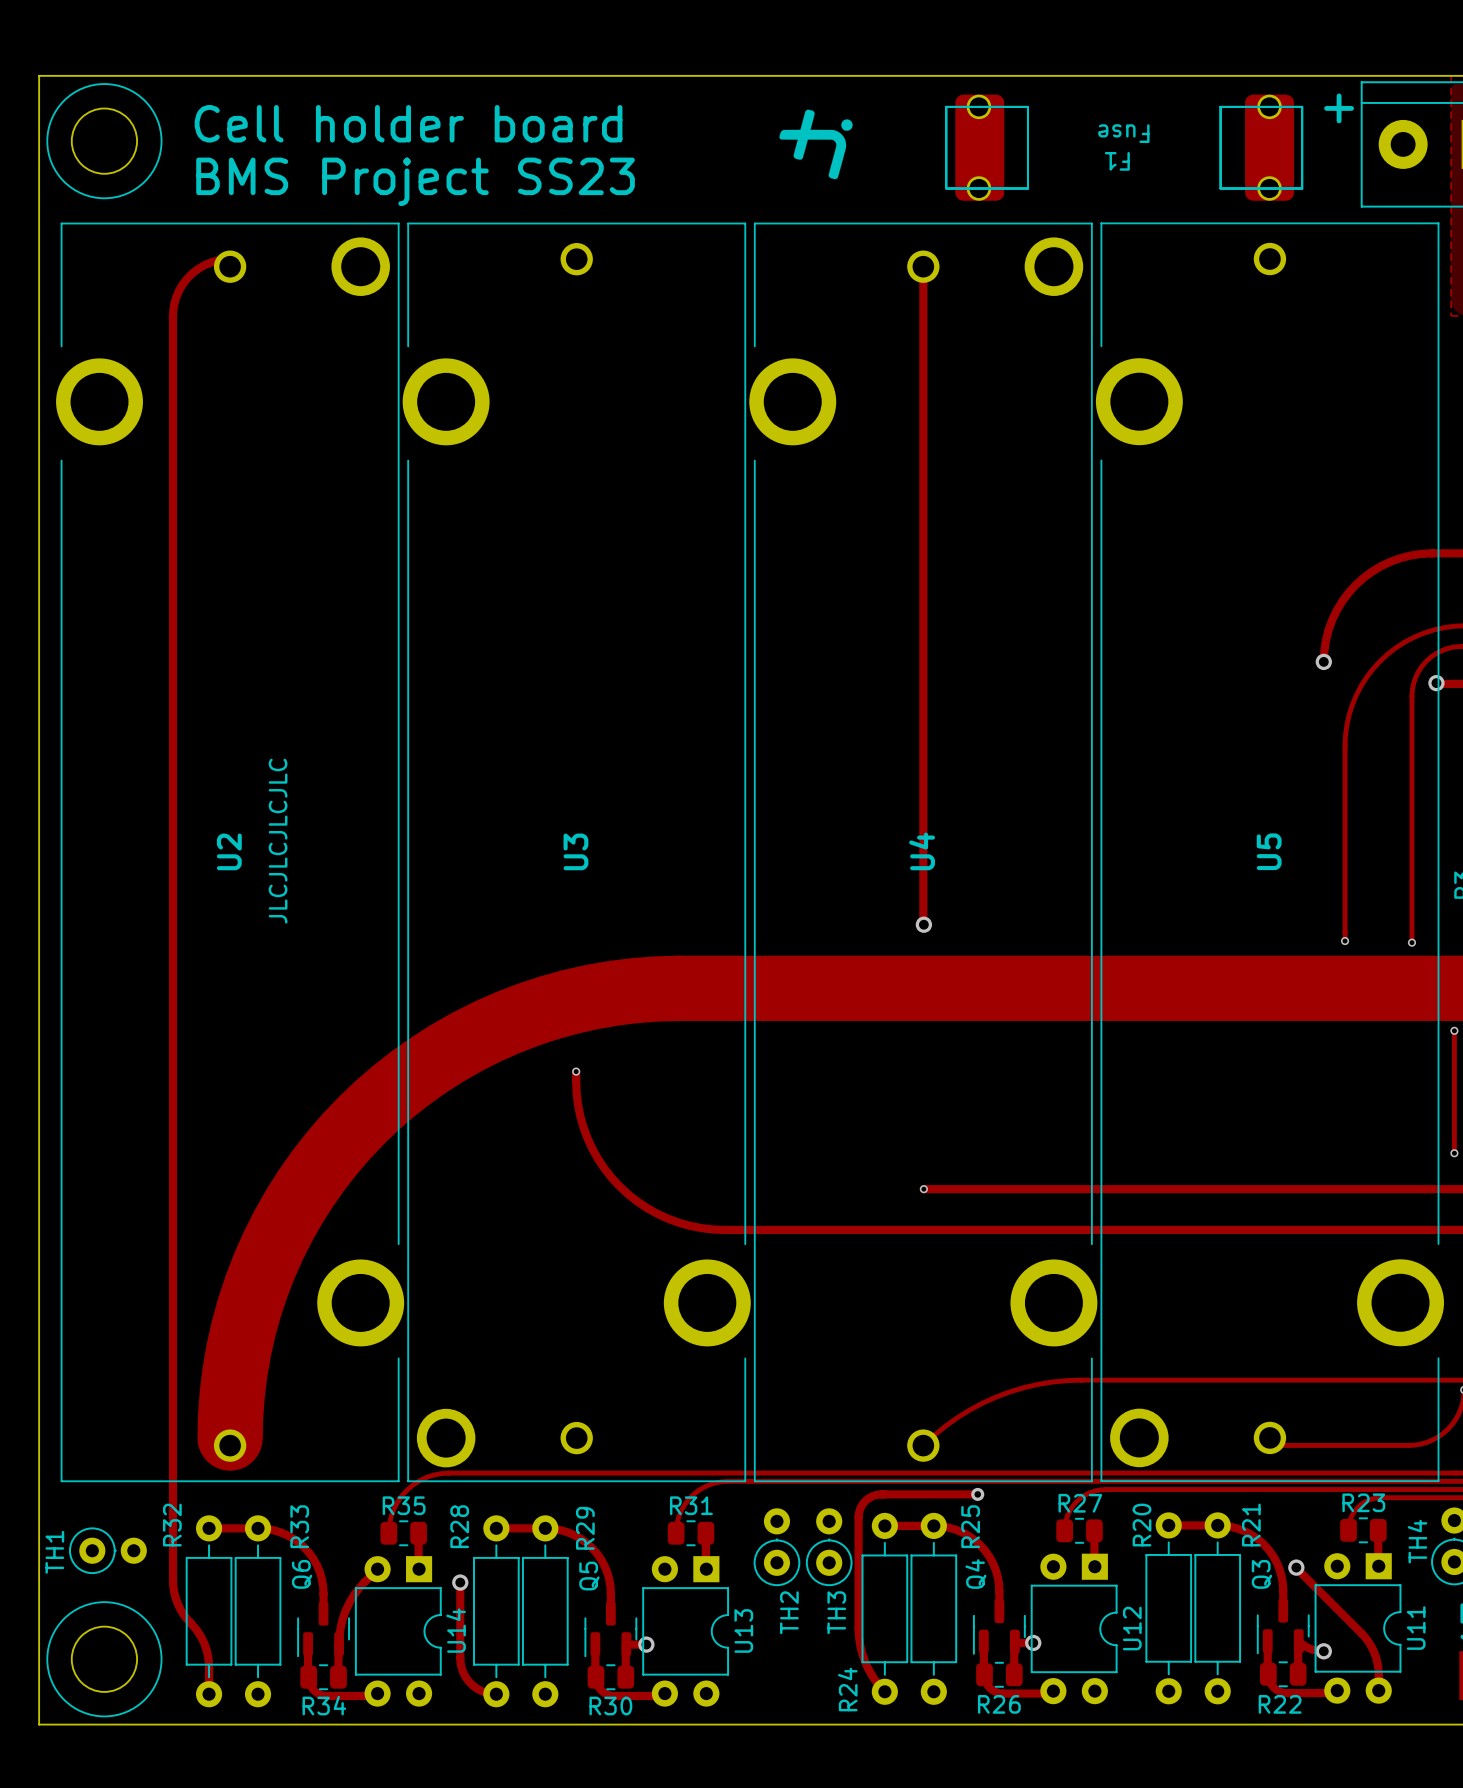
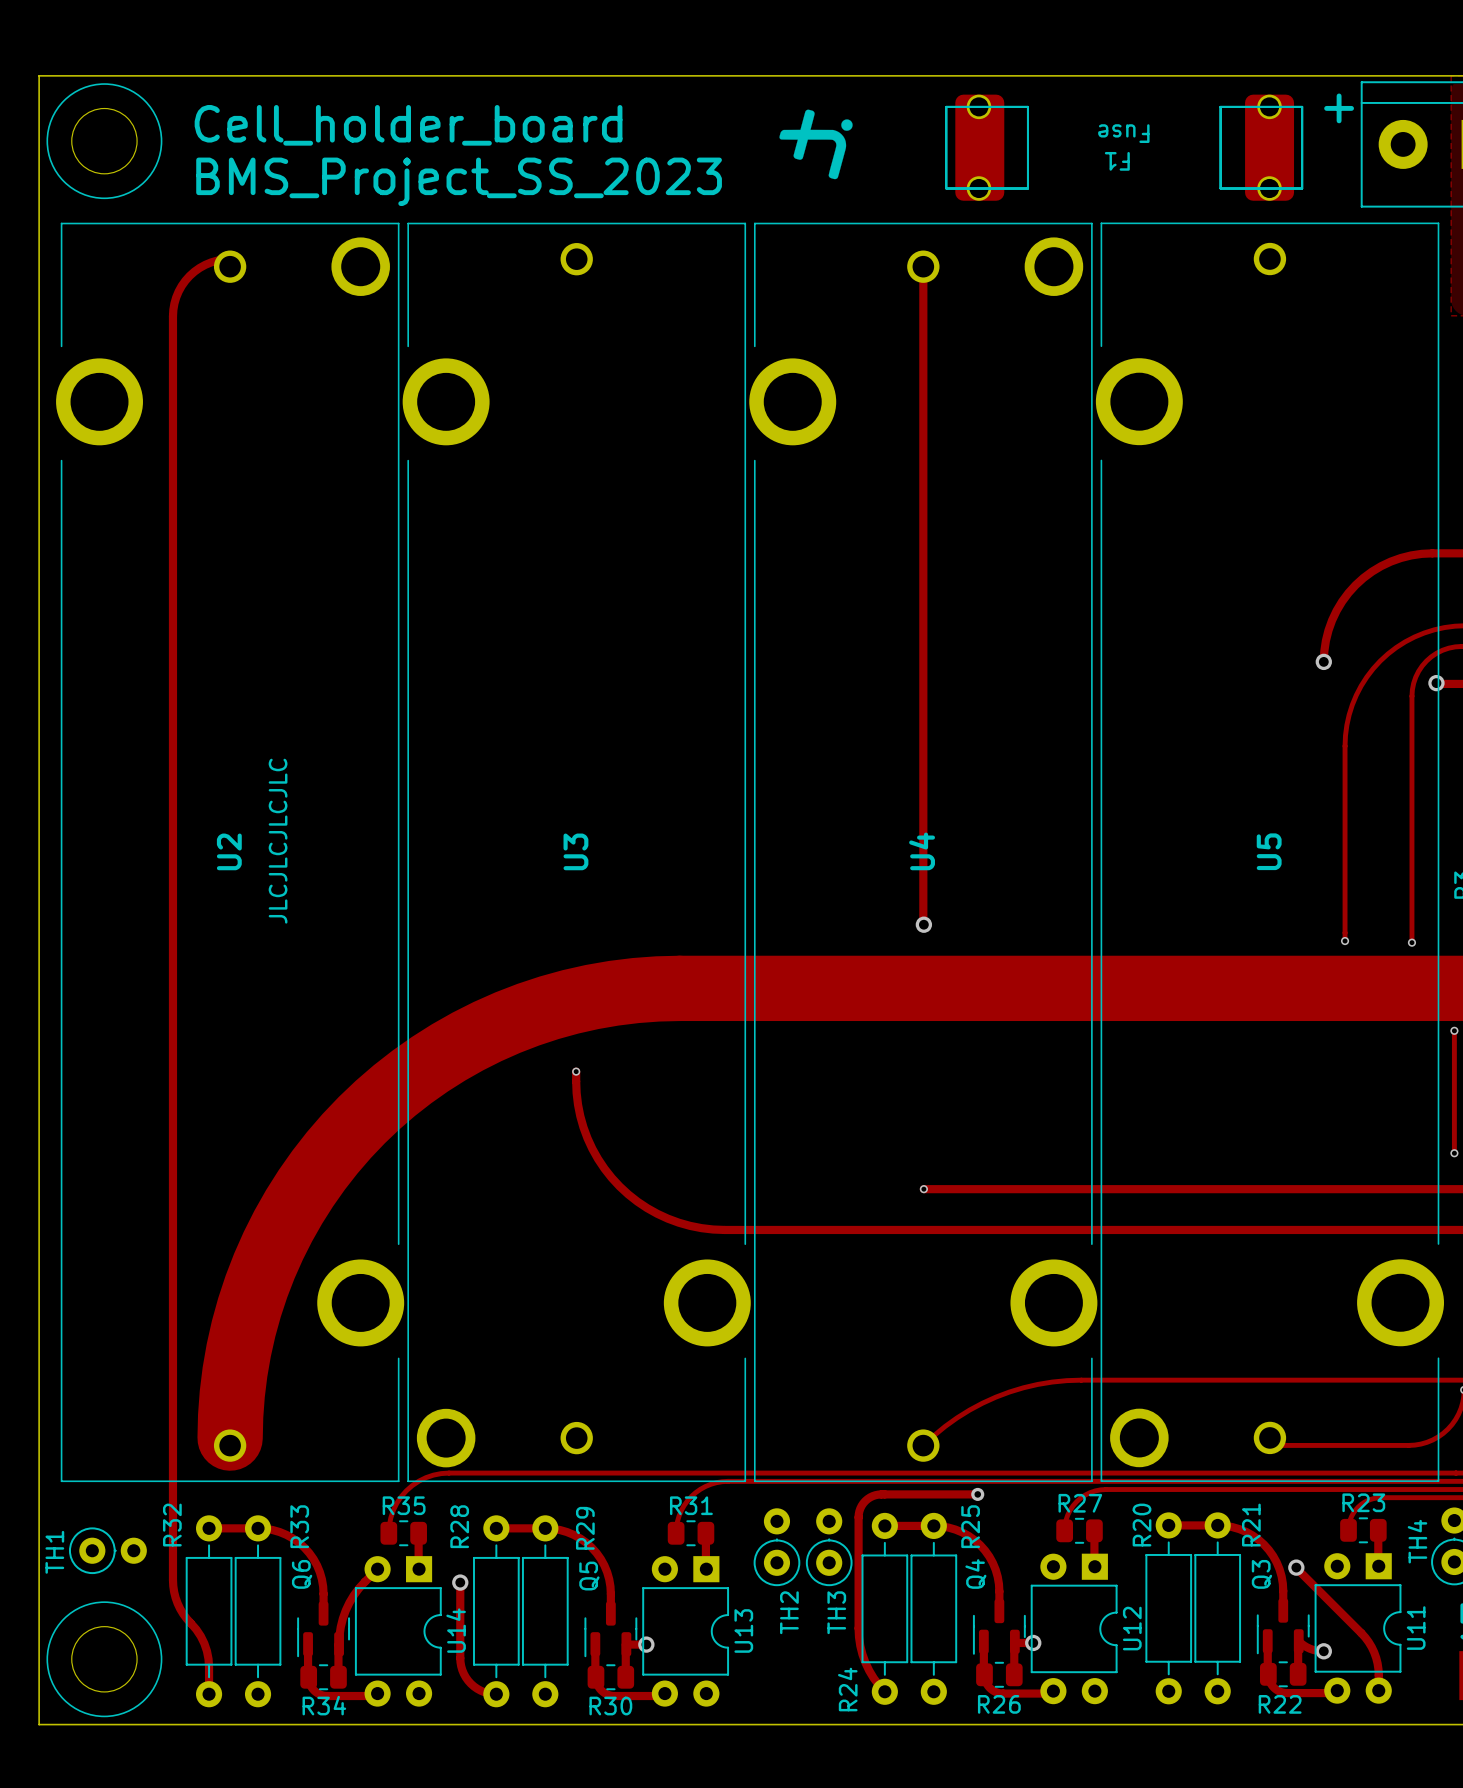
text: Cell holder board (408, 123) -> Cell_holder_board (408, 125)
text: BMS Project SS23 (415, 181) -> BMS_Project_SS_2023 (459, 181)

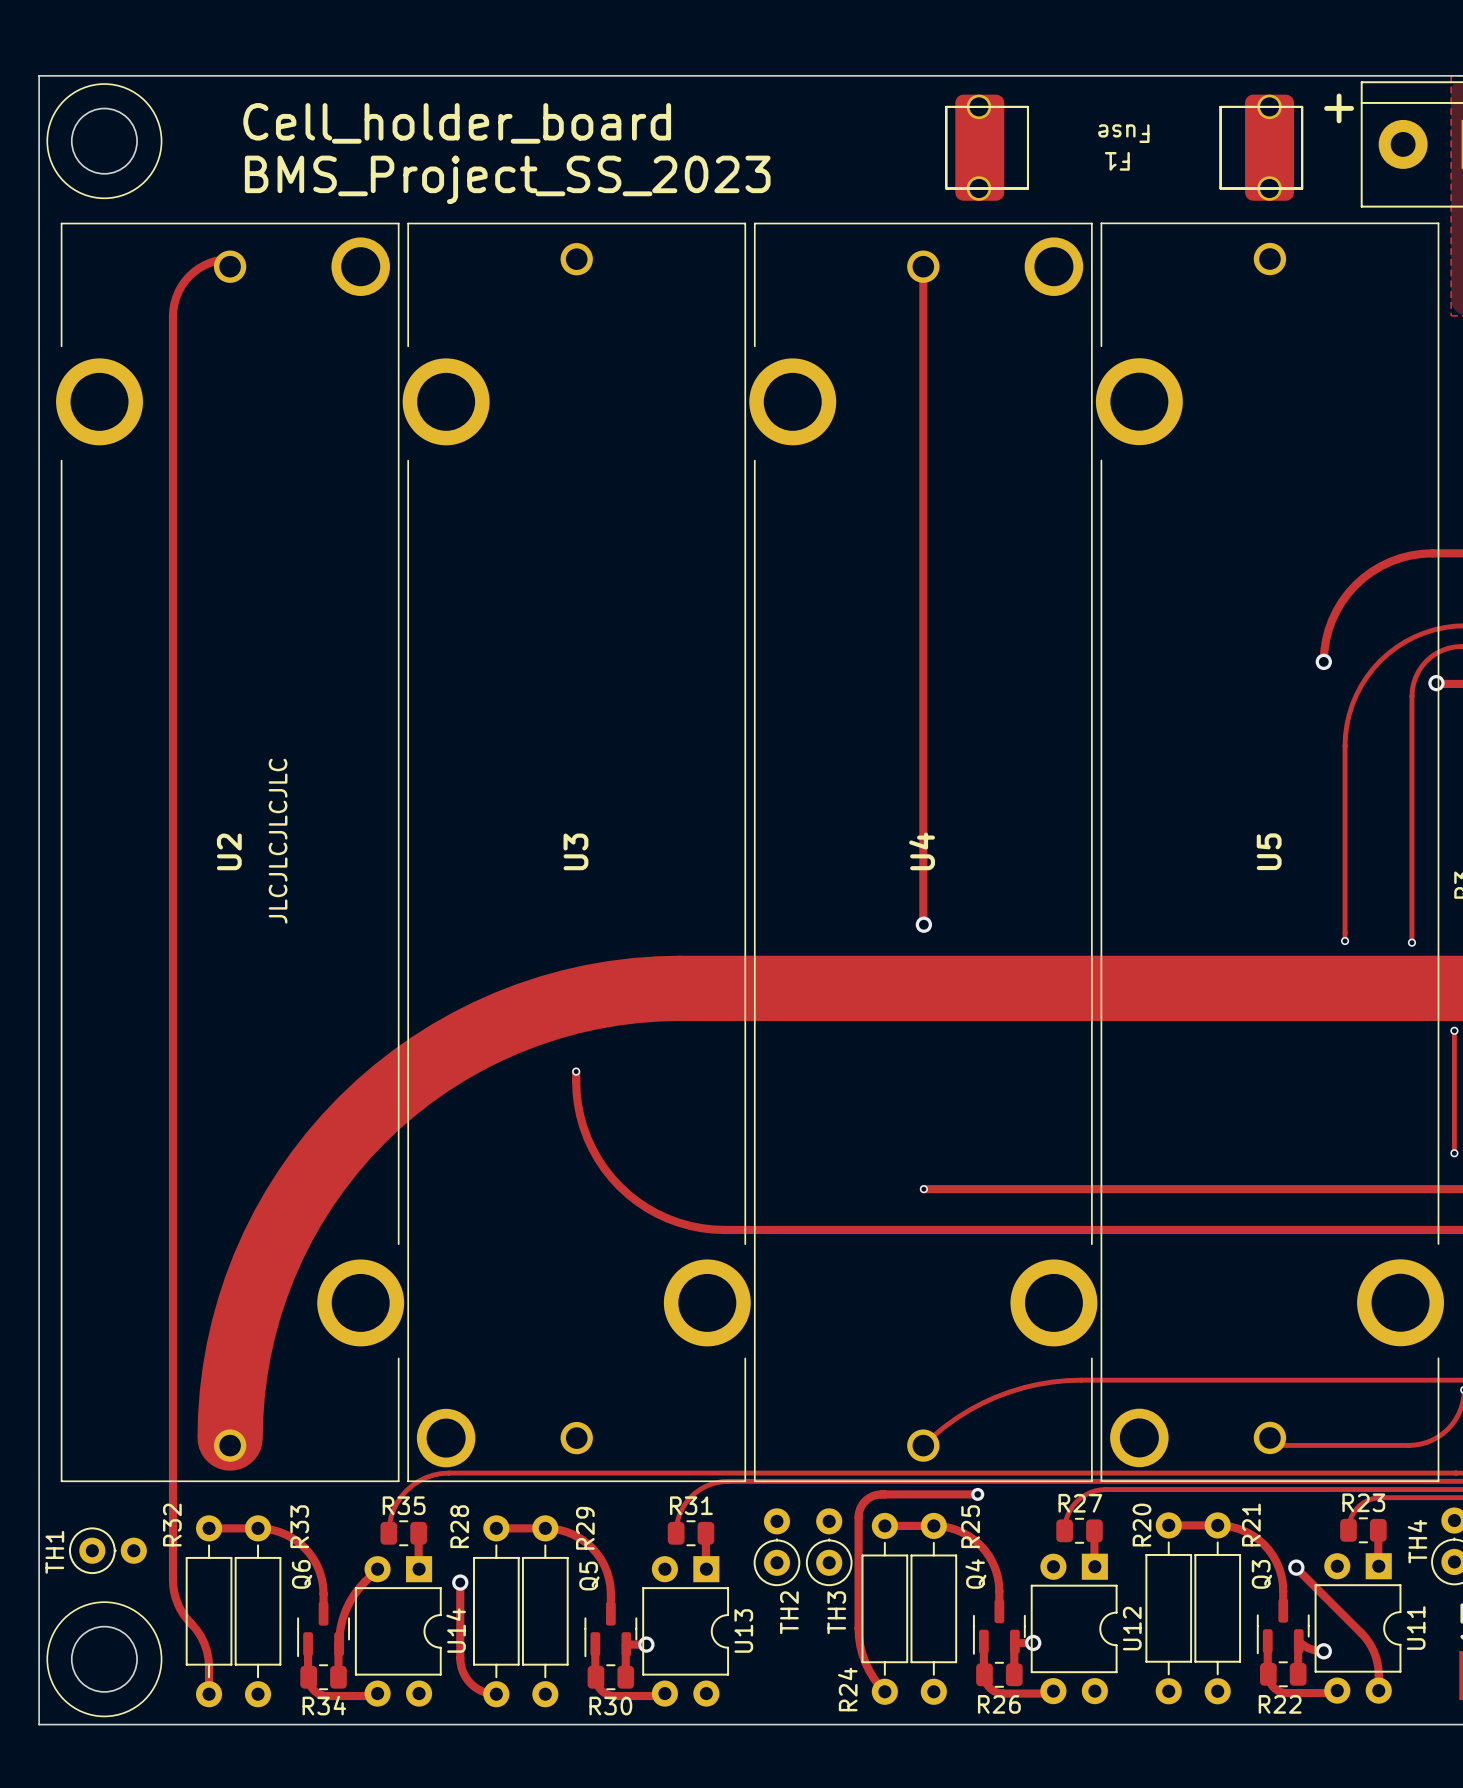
drawing: [779, 109, 853, 180] -> none
text position: Cell_holder_board (408, 125) -> Cell_holder_board (457, 123)
text position: BMS_Project_SS_2023 (459, 181) -> BMS_Project_SS_2023 (507, 179)

